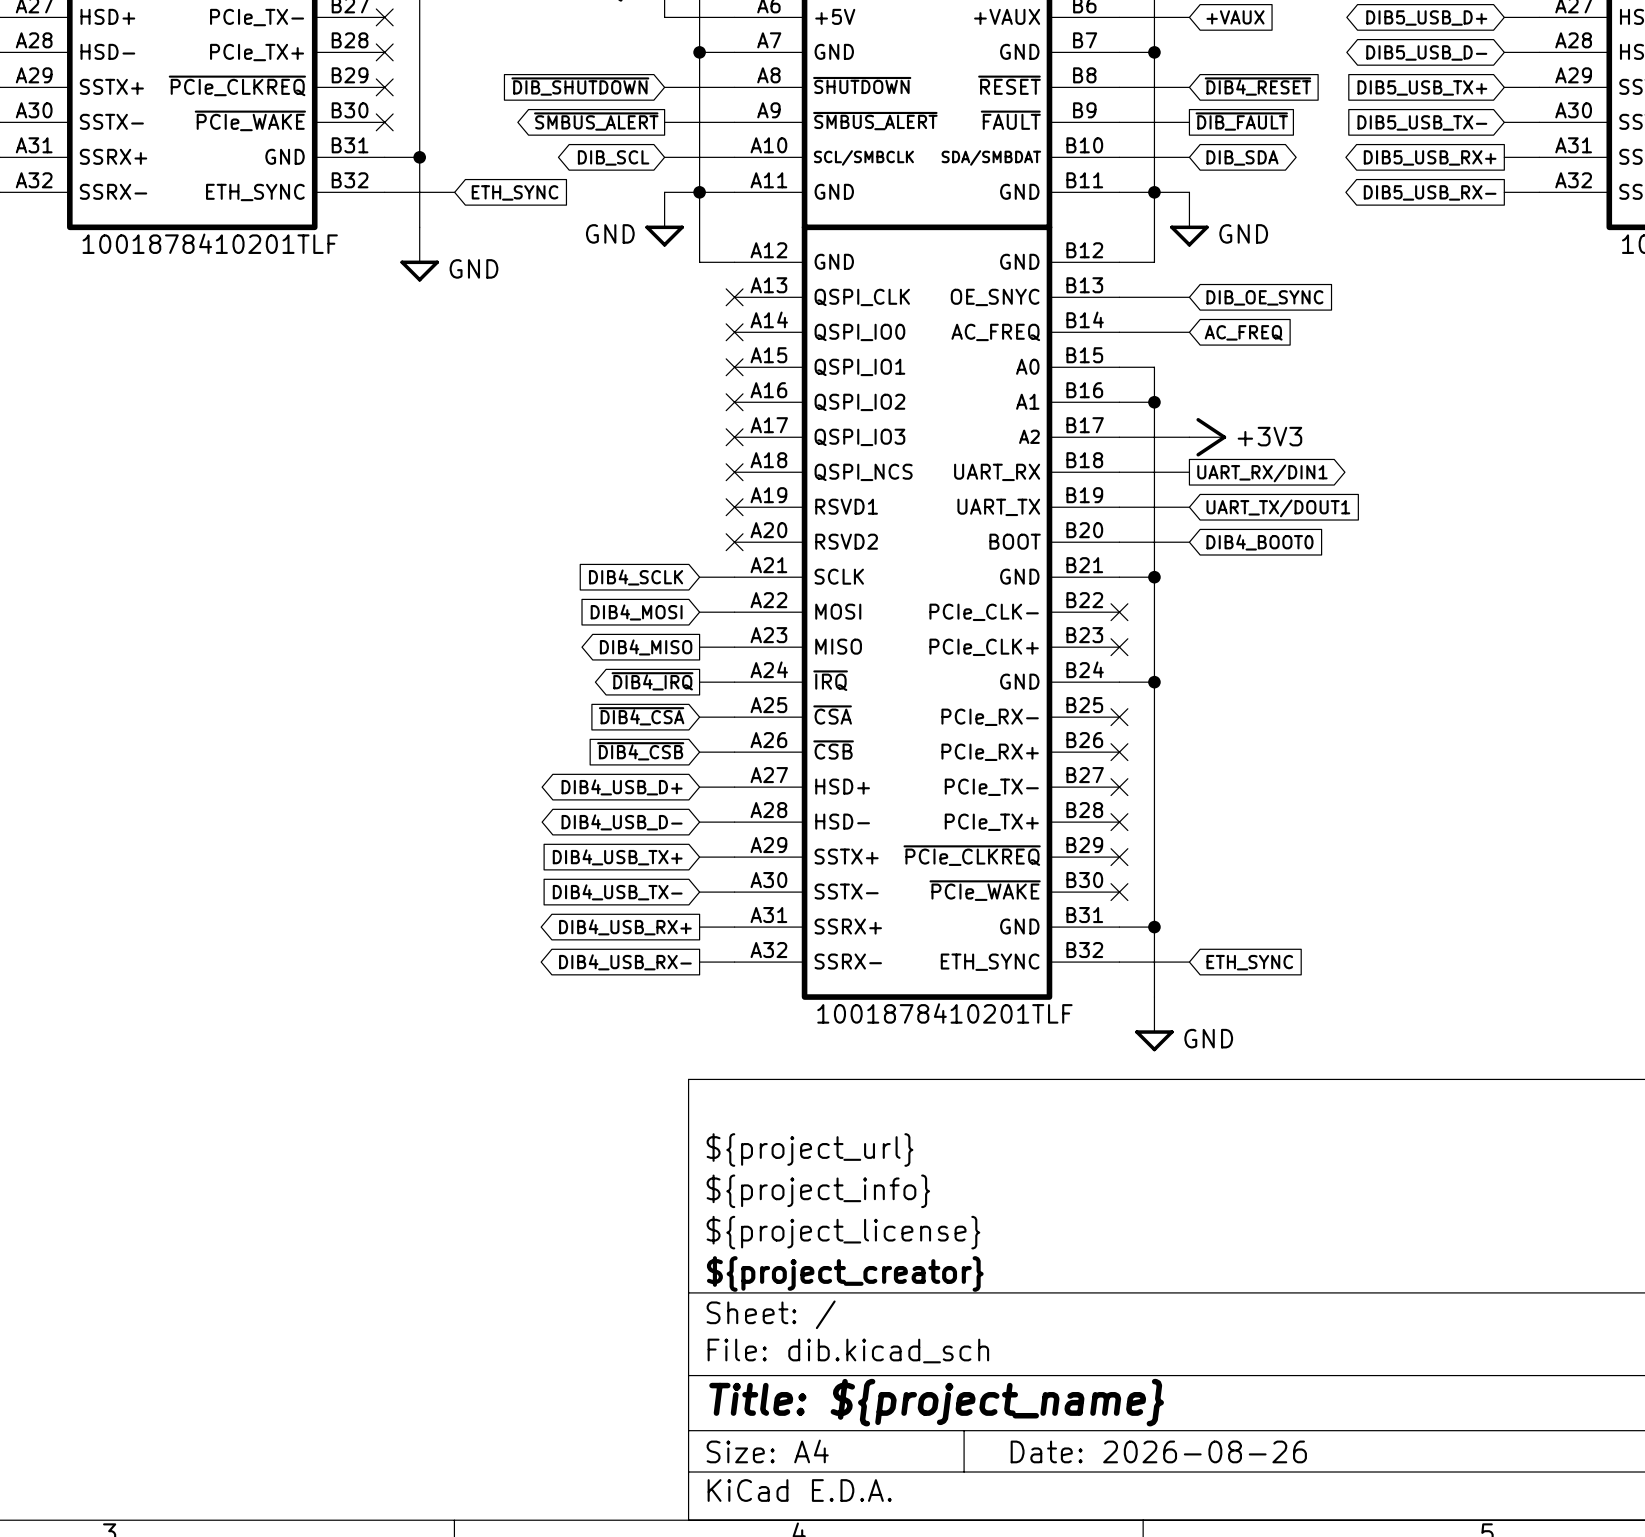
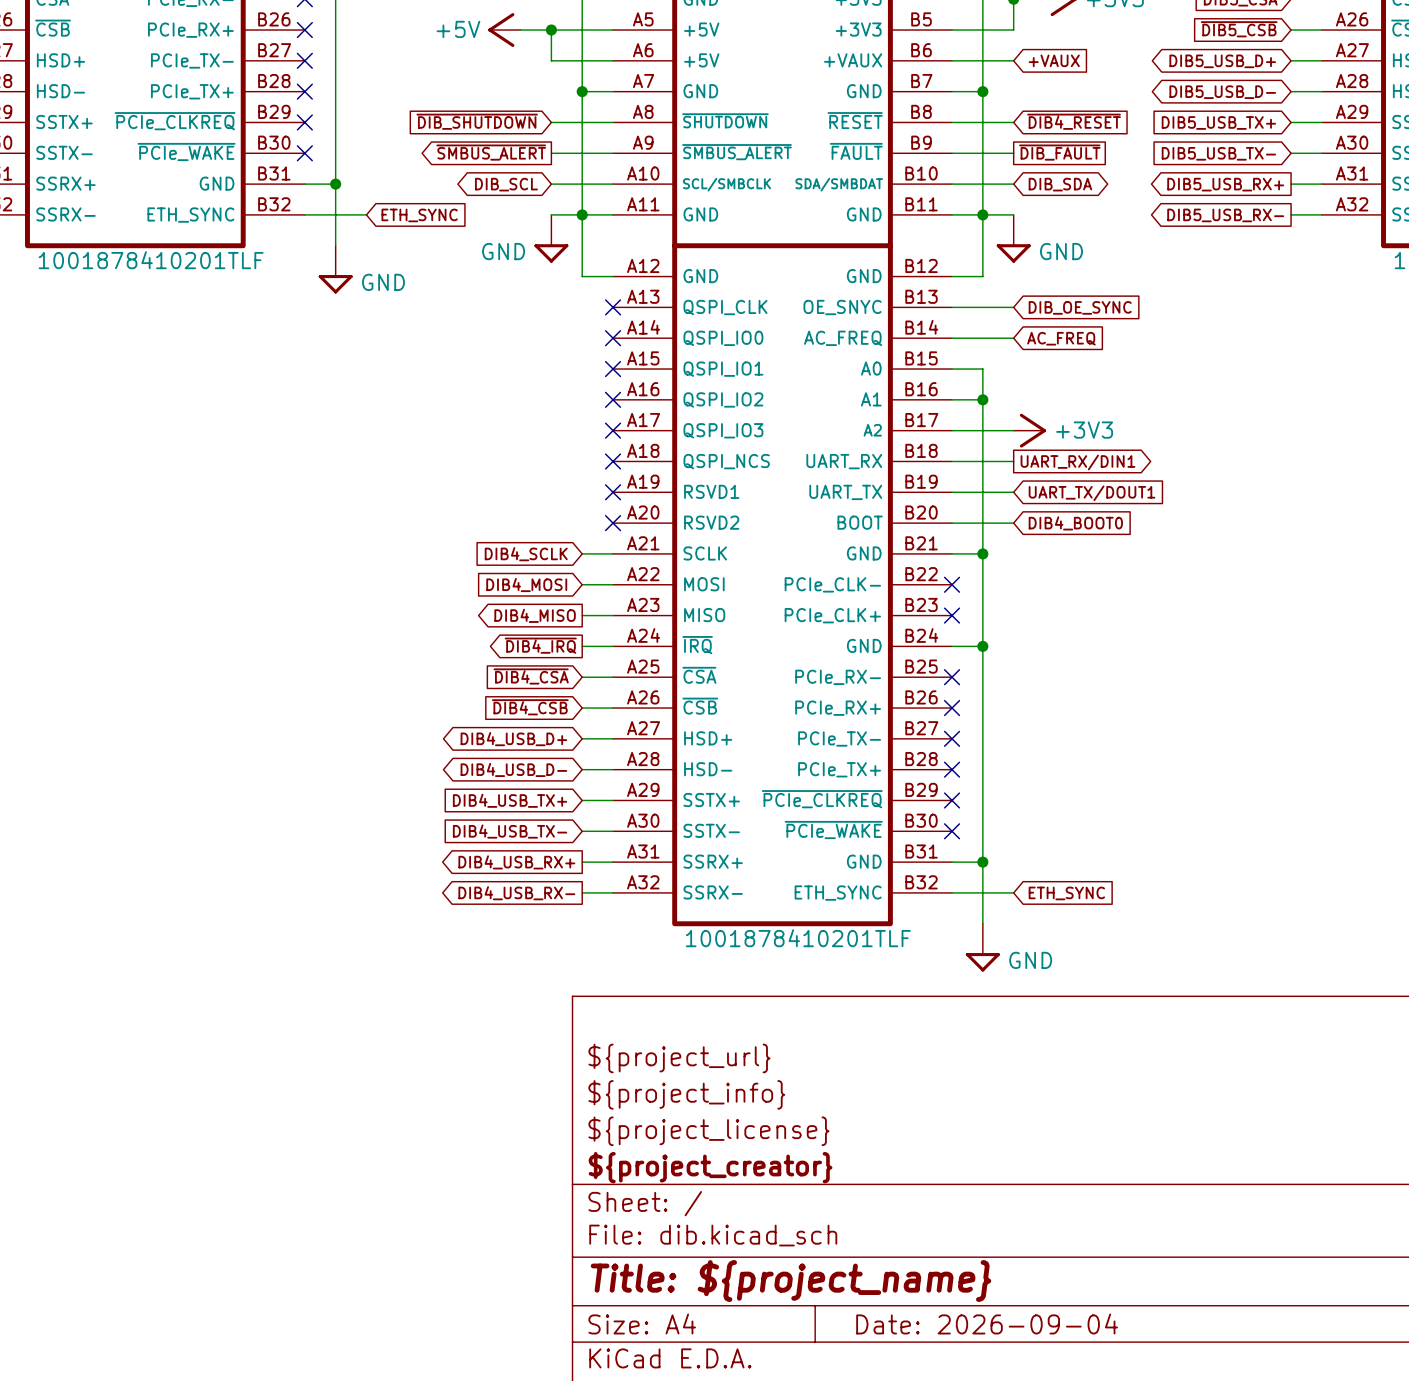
title block: Date: 2026-08-26 (1158, 1451) -> Date: 2026-09-04 (987, 1324)

